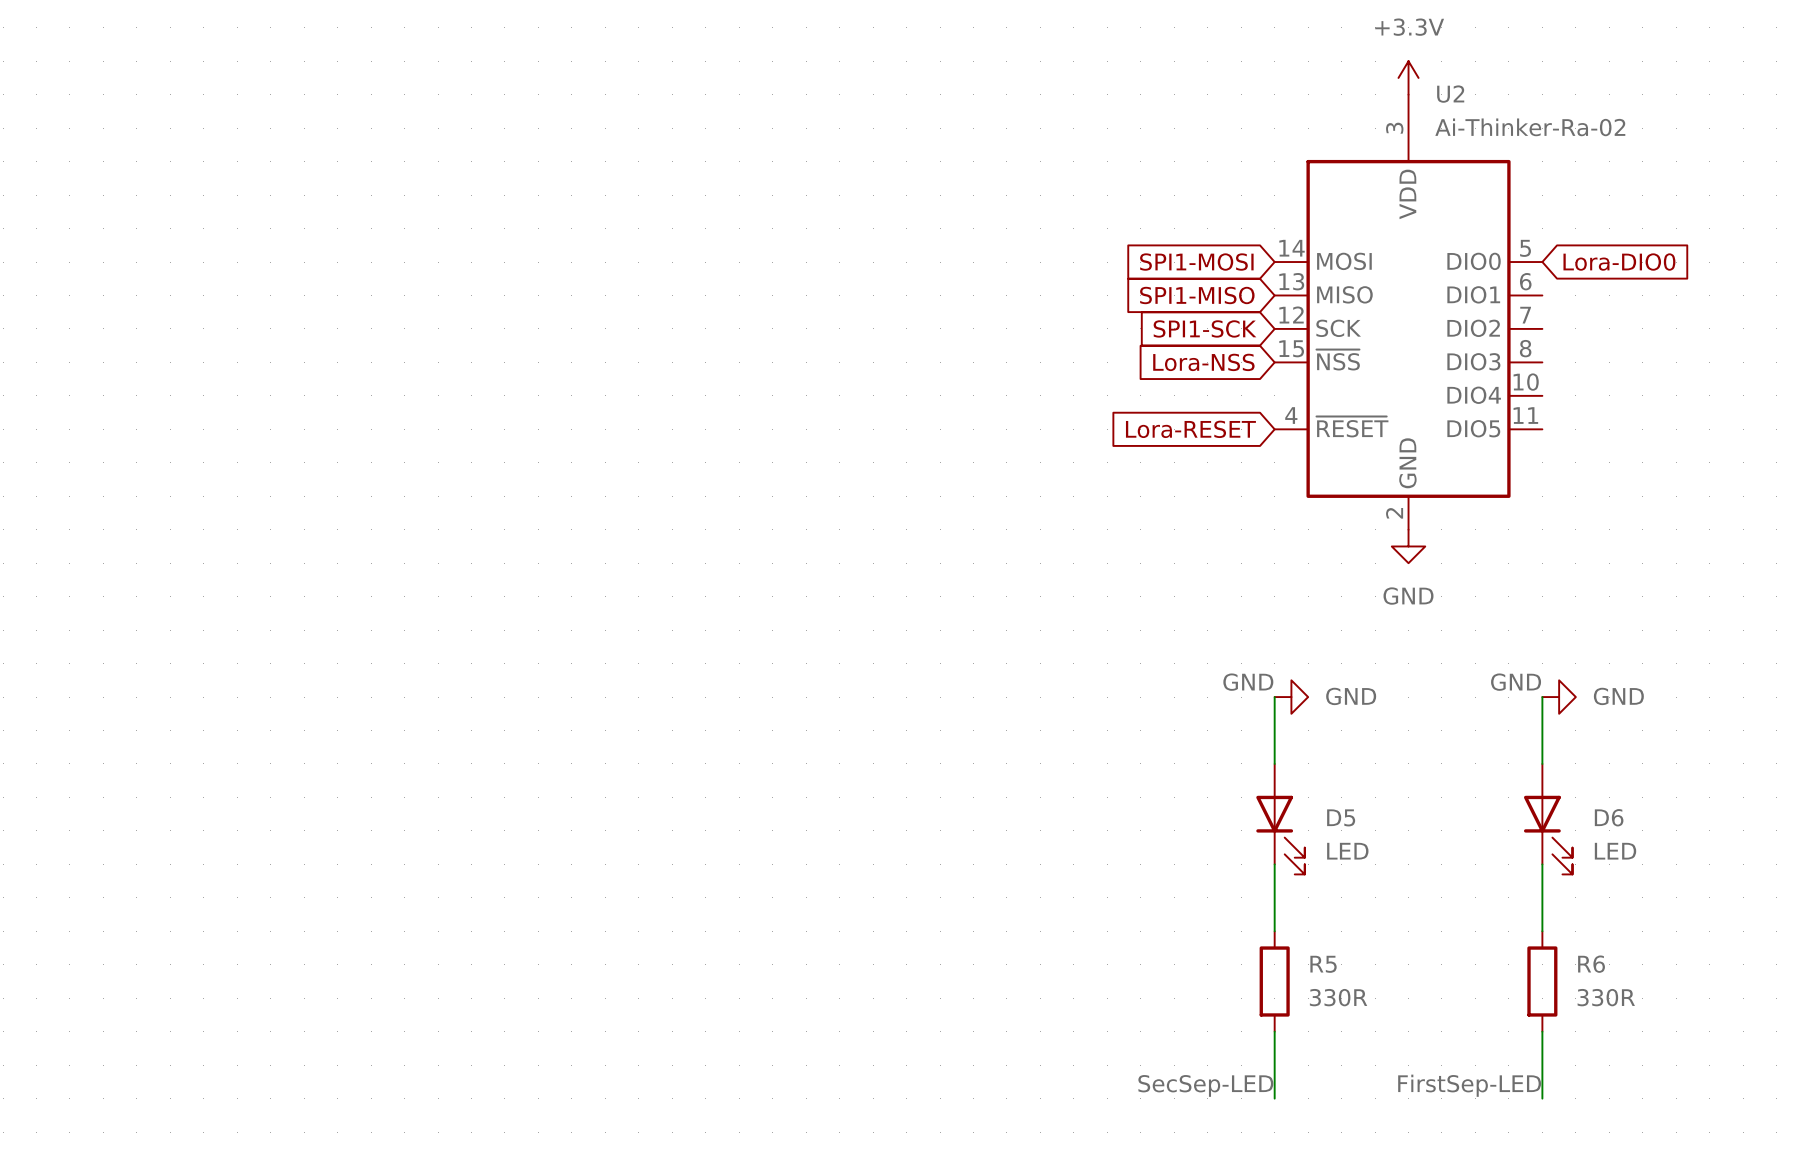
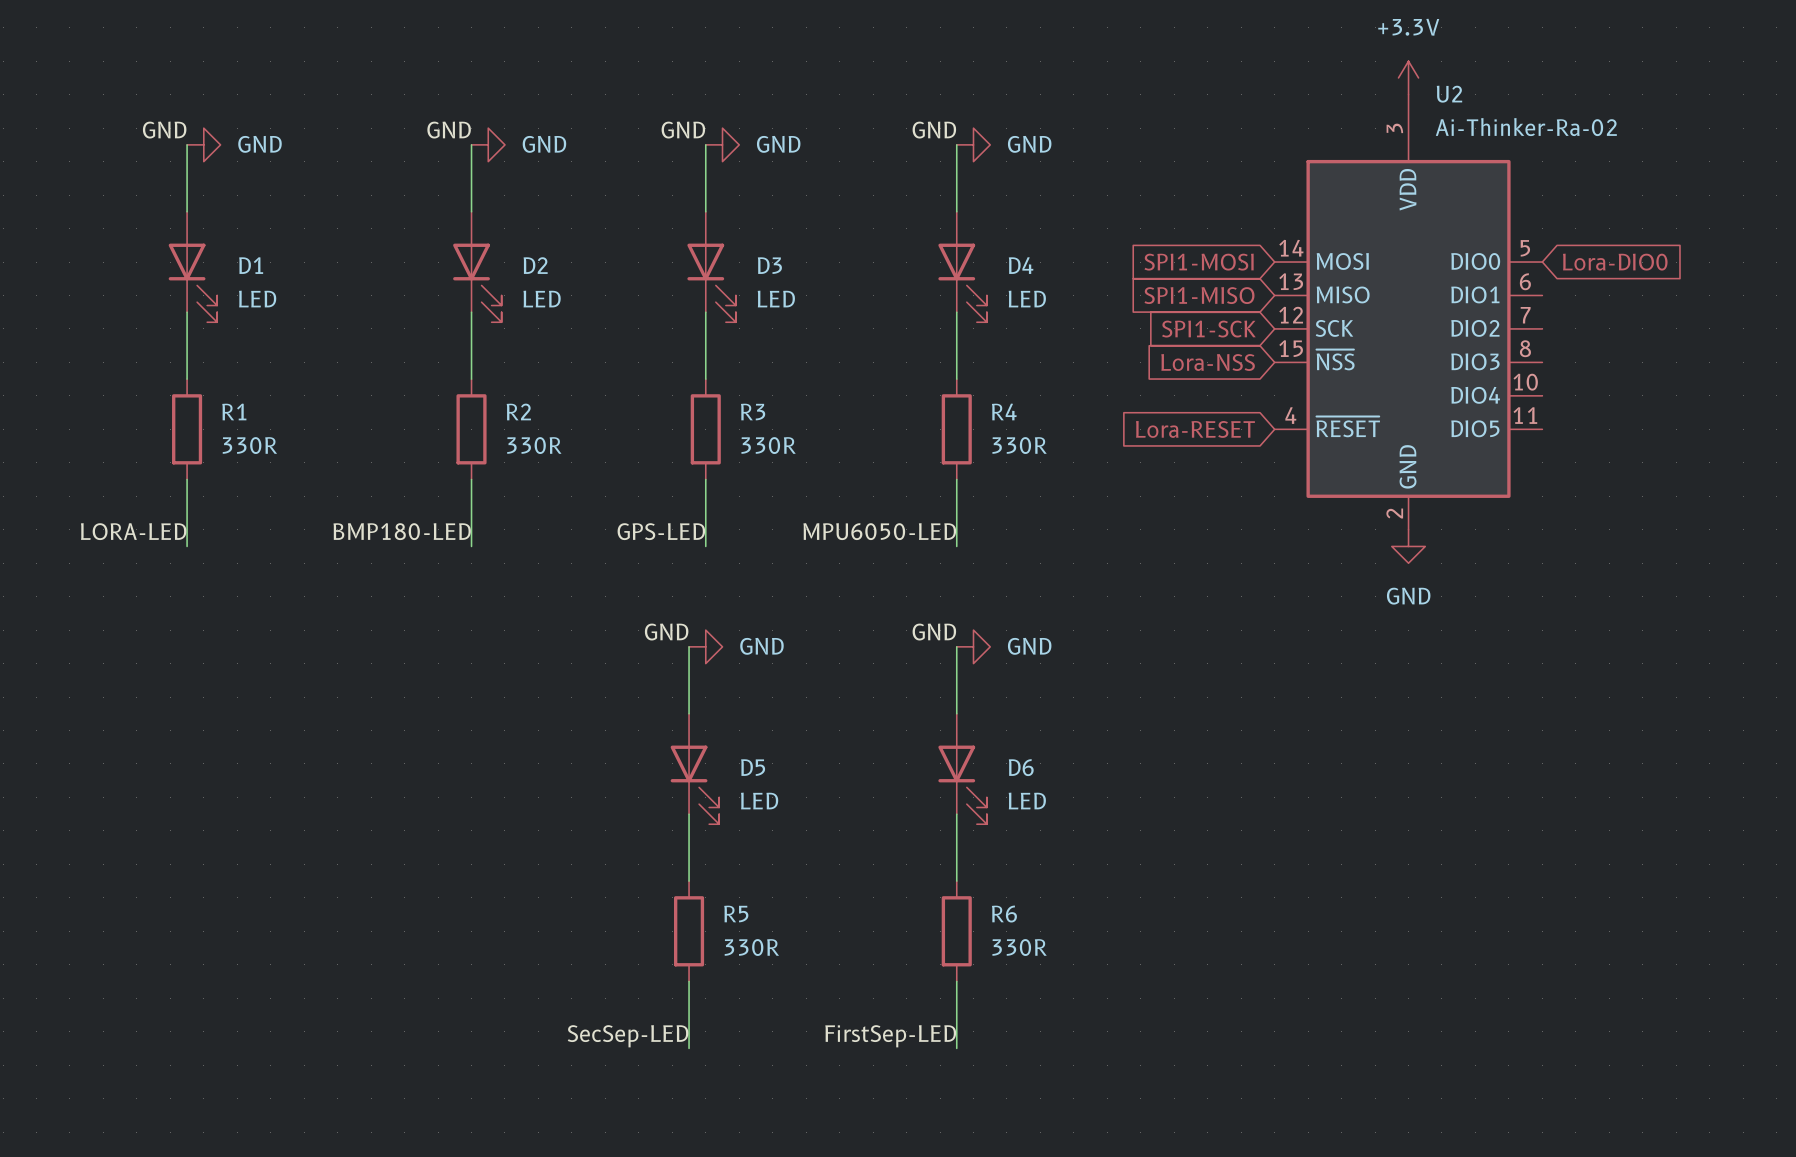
label: none -> GND (164, 130)
label: none -> GND (449, 130)
label: none -> GND (683, 130)
label: none -> GND (934, 130)
wire: none -> (187, 144) (187, 211)
power symbol: none -> GND (203, 144)
wire: none -> (471, 144) (471, 211)
power symbol: none -> GND (488, 144)
wire: none -> (705, 144) (705, 211)
power symbol: none -> GND (722, 144)
wire: none -> (956, 144) (956, 211)
power symbol: none -> GND (973, 144)
D1: none -> LED (192, 267)
D2: none -> LED (477, 267)
D3: none -> LED (711, 267)
D4: none -> LED (962, 267)
wire: none -> (187, 312) (187, 379)
wire: none -> (471, 312) (471, 379)
wire: none -> (705, 312) (705, 379)
wire: none -> (956, 312) (956, 379)
R1: none -> 330R (187, 429)
R2: none -> 330R (471, 429)
R3: none -> 330R (705, 429)
R4: none -> 330R (956, 429)
wire: none -> (187, 479) (187, 546)
wire: none -> (471, 479) (471, 546)
wire: none -> (705, 479) (705, 546)
wire: none -> (956, 479) (956, 546)
label: none -> LORA-LED (133, 531)
label: none -> BMP180-LED (402, 531)
label: none -> GPS-LED (661, 531)
label: none -> MPU6050-LED (879, 531)
label: none -> GND (666, 632)
label: none -> GND (934, 632)
wire: none -> (689, 646) (689, 713)
power symbol: none -> GND (705, 646)
power symbol: none -> GND (973, 646)
label: GND (1248, 682) -> none
label: GND (1516, 682) -> none
wire: (1274, 697) (1274, 763) -> (956, 646) (956, 713)
power symbol: GND (1291, 697) -> none
wire: (1542, 697) (1542, 763) -> none
power symbol: GND (1559, 697) -> none
wire: none -> (689, 814) (689, 881)
D5 position: (1280, 819) -> (694, 769)
D6 position: (1548, 819) -> (962, 769)
wire: (1274, 864) (1274, 931) -> (956, 814) (956, 881)
wire: (1542, 864) (1542, 931) -> none
wire: none -> (689, 981) (689, 1048)
R5 position: (1274, 981) -> (689, 931)
R6 position: (1542, 981) -> (956, 931)
wire: (1274, 1031) (1274, 1098) -> (956, 981) (956, 1048)
wire: (1542, 1031) (1542, 1098) -> none
label: none -> SecSep-LED (628, 1036)
label: none -> FirstSep-LED (890, 1036)
label: SecSep-LED (1205, 1085) -> none
label: FirstSep-LED (1469, 1085) -> none

